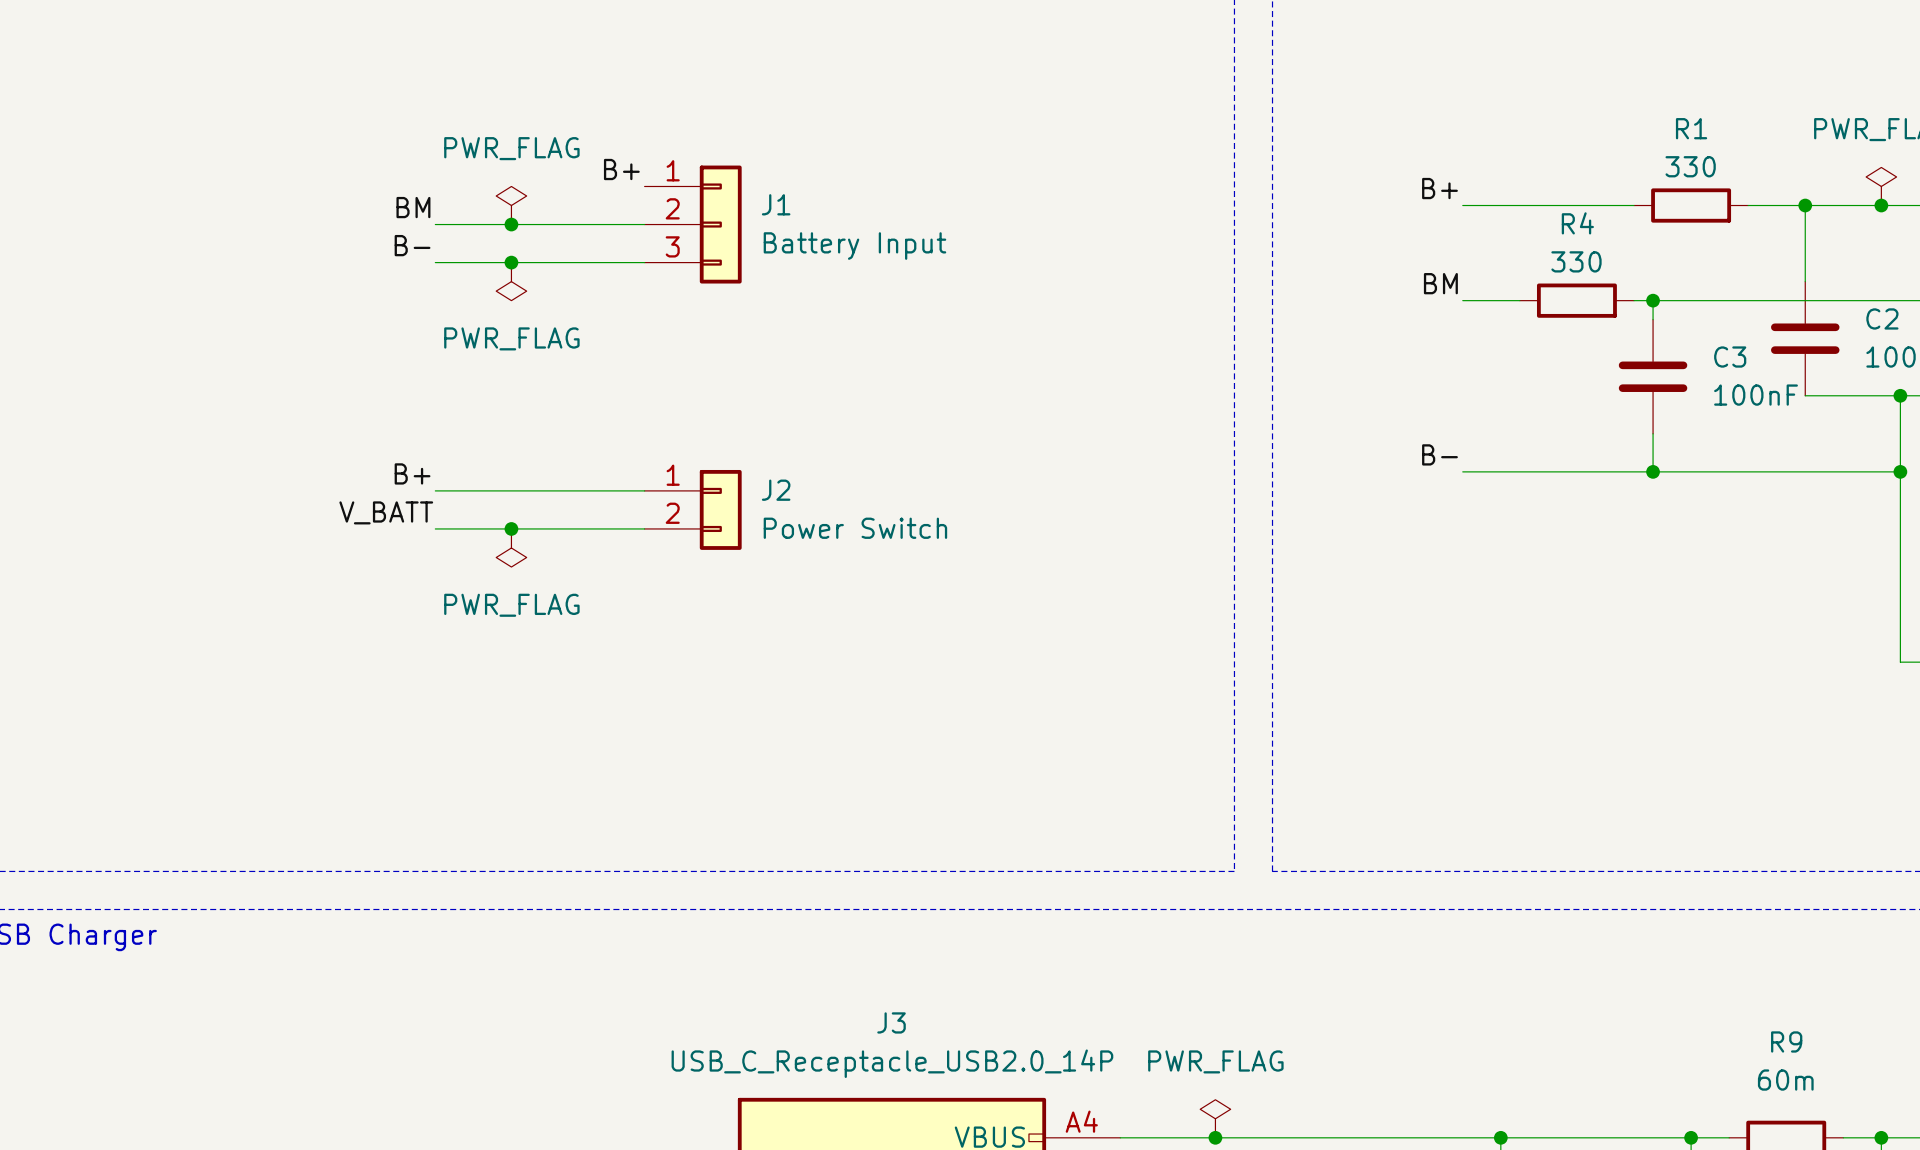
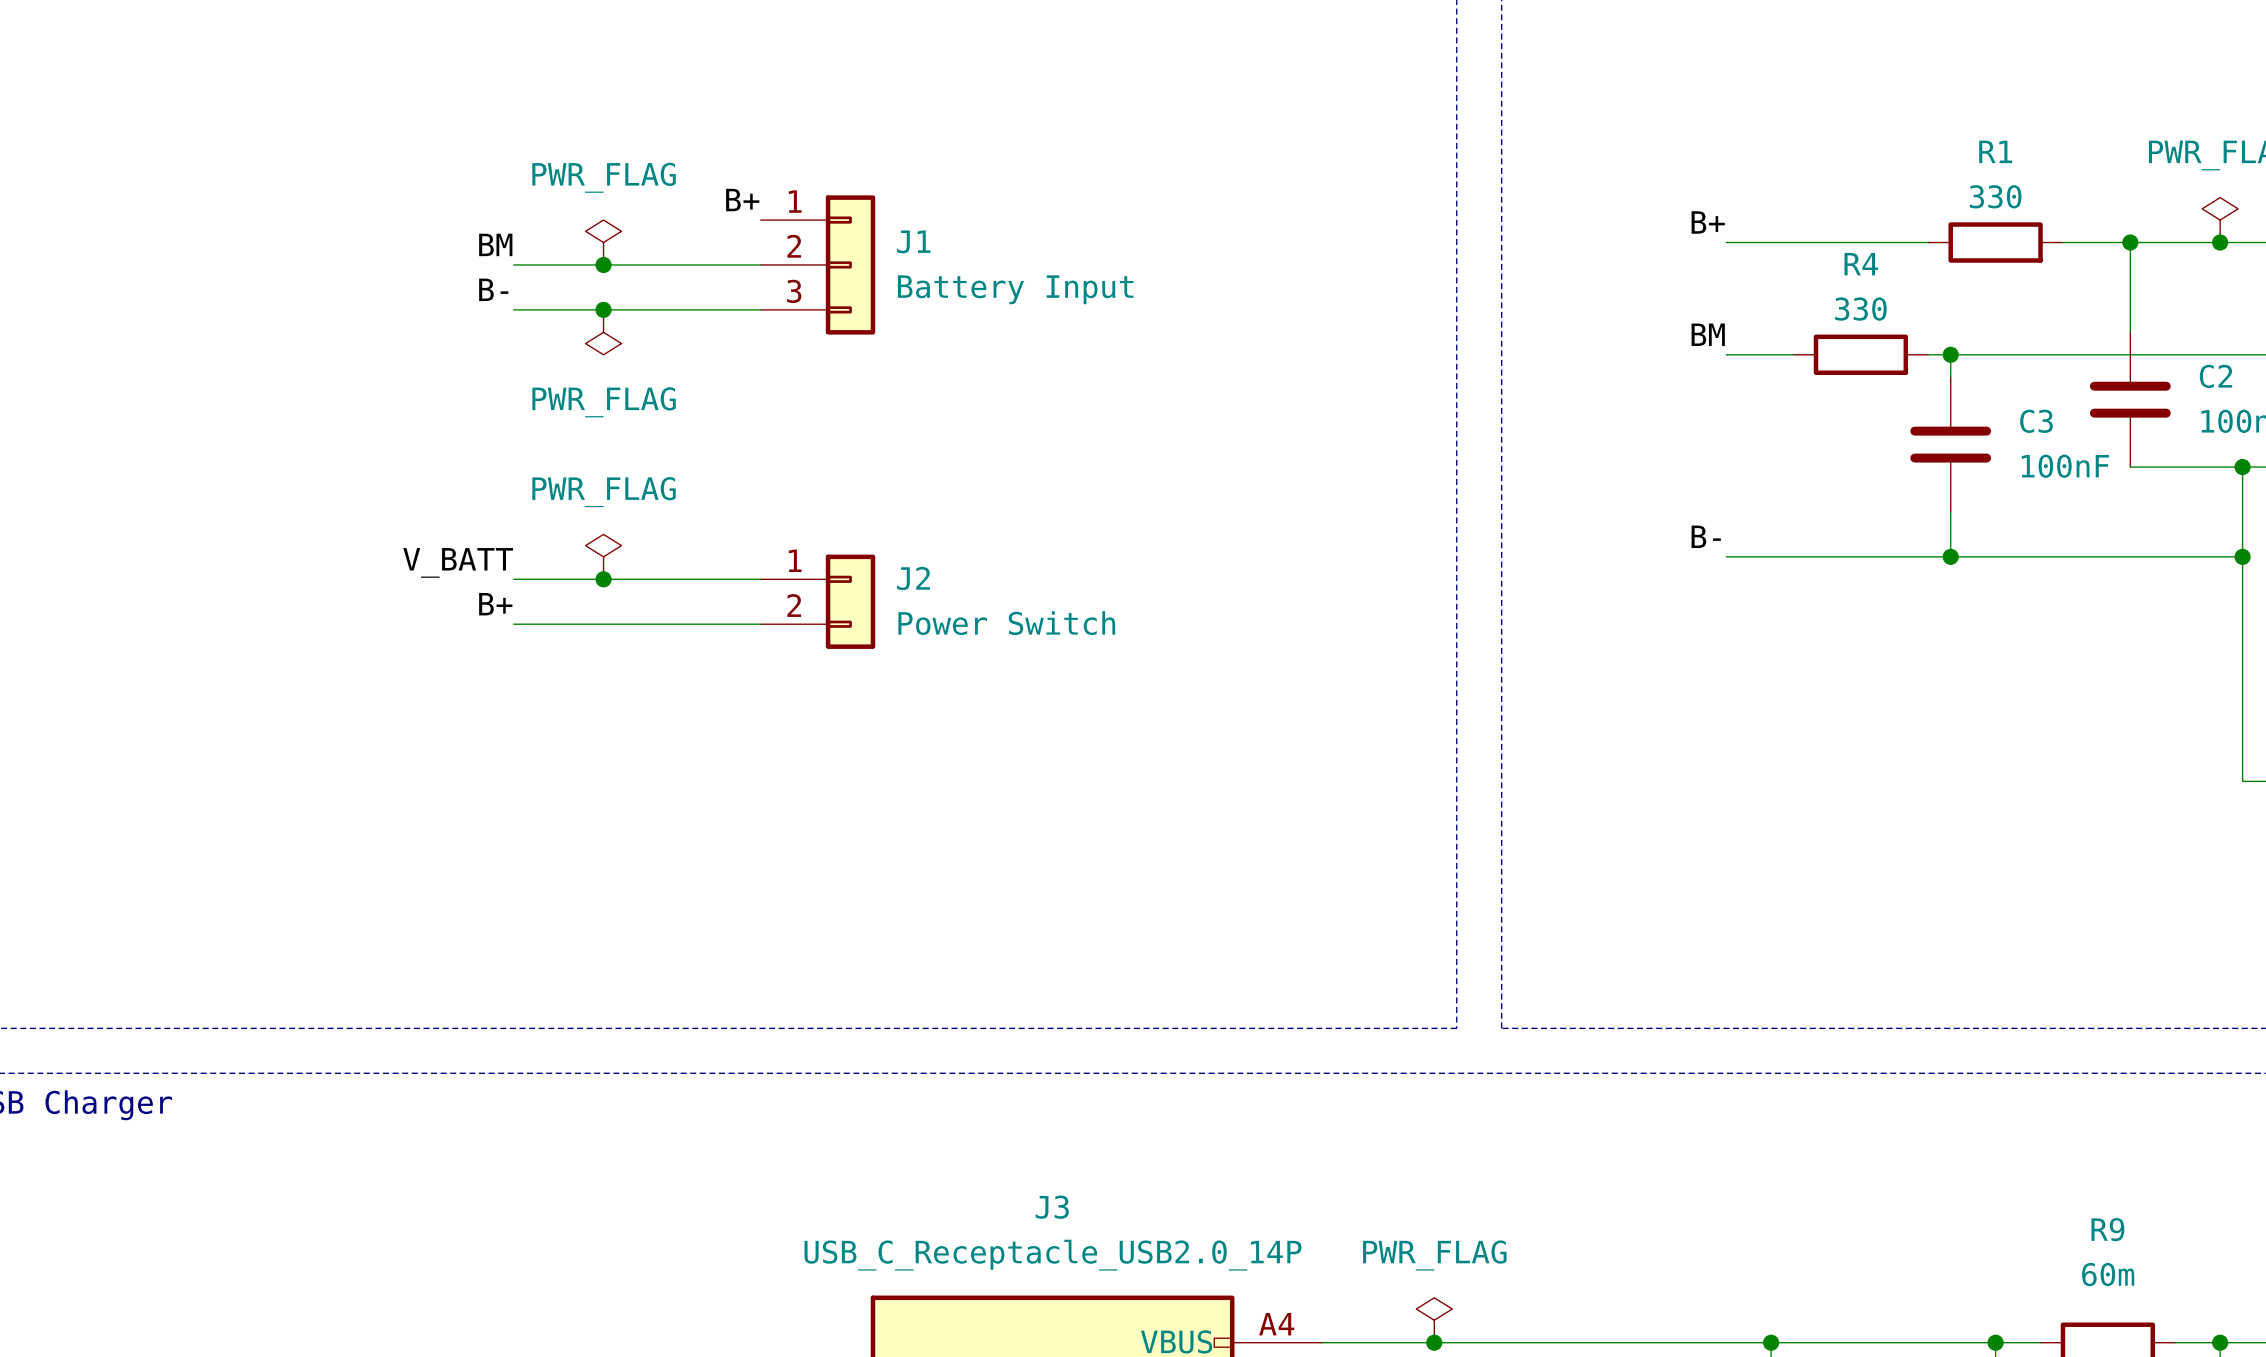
label: B+ (412, 473) -> V_BATT (458, 562)
label: V_BATT (386, 512) -> B+ (495, 604)
junction position: (511, 528) -> (603, 579)
power symbol rotation: 0° (511, 547) -> 180° (603, 556)
power symbol position: PWR_FLAG (511, 547) -> PWR_FLAG (603, 556)

